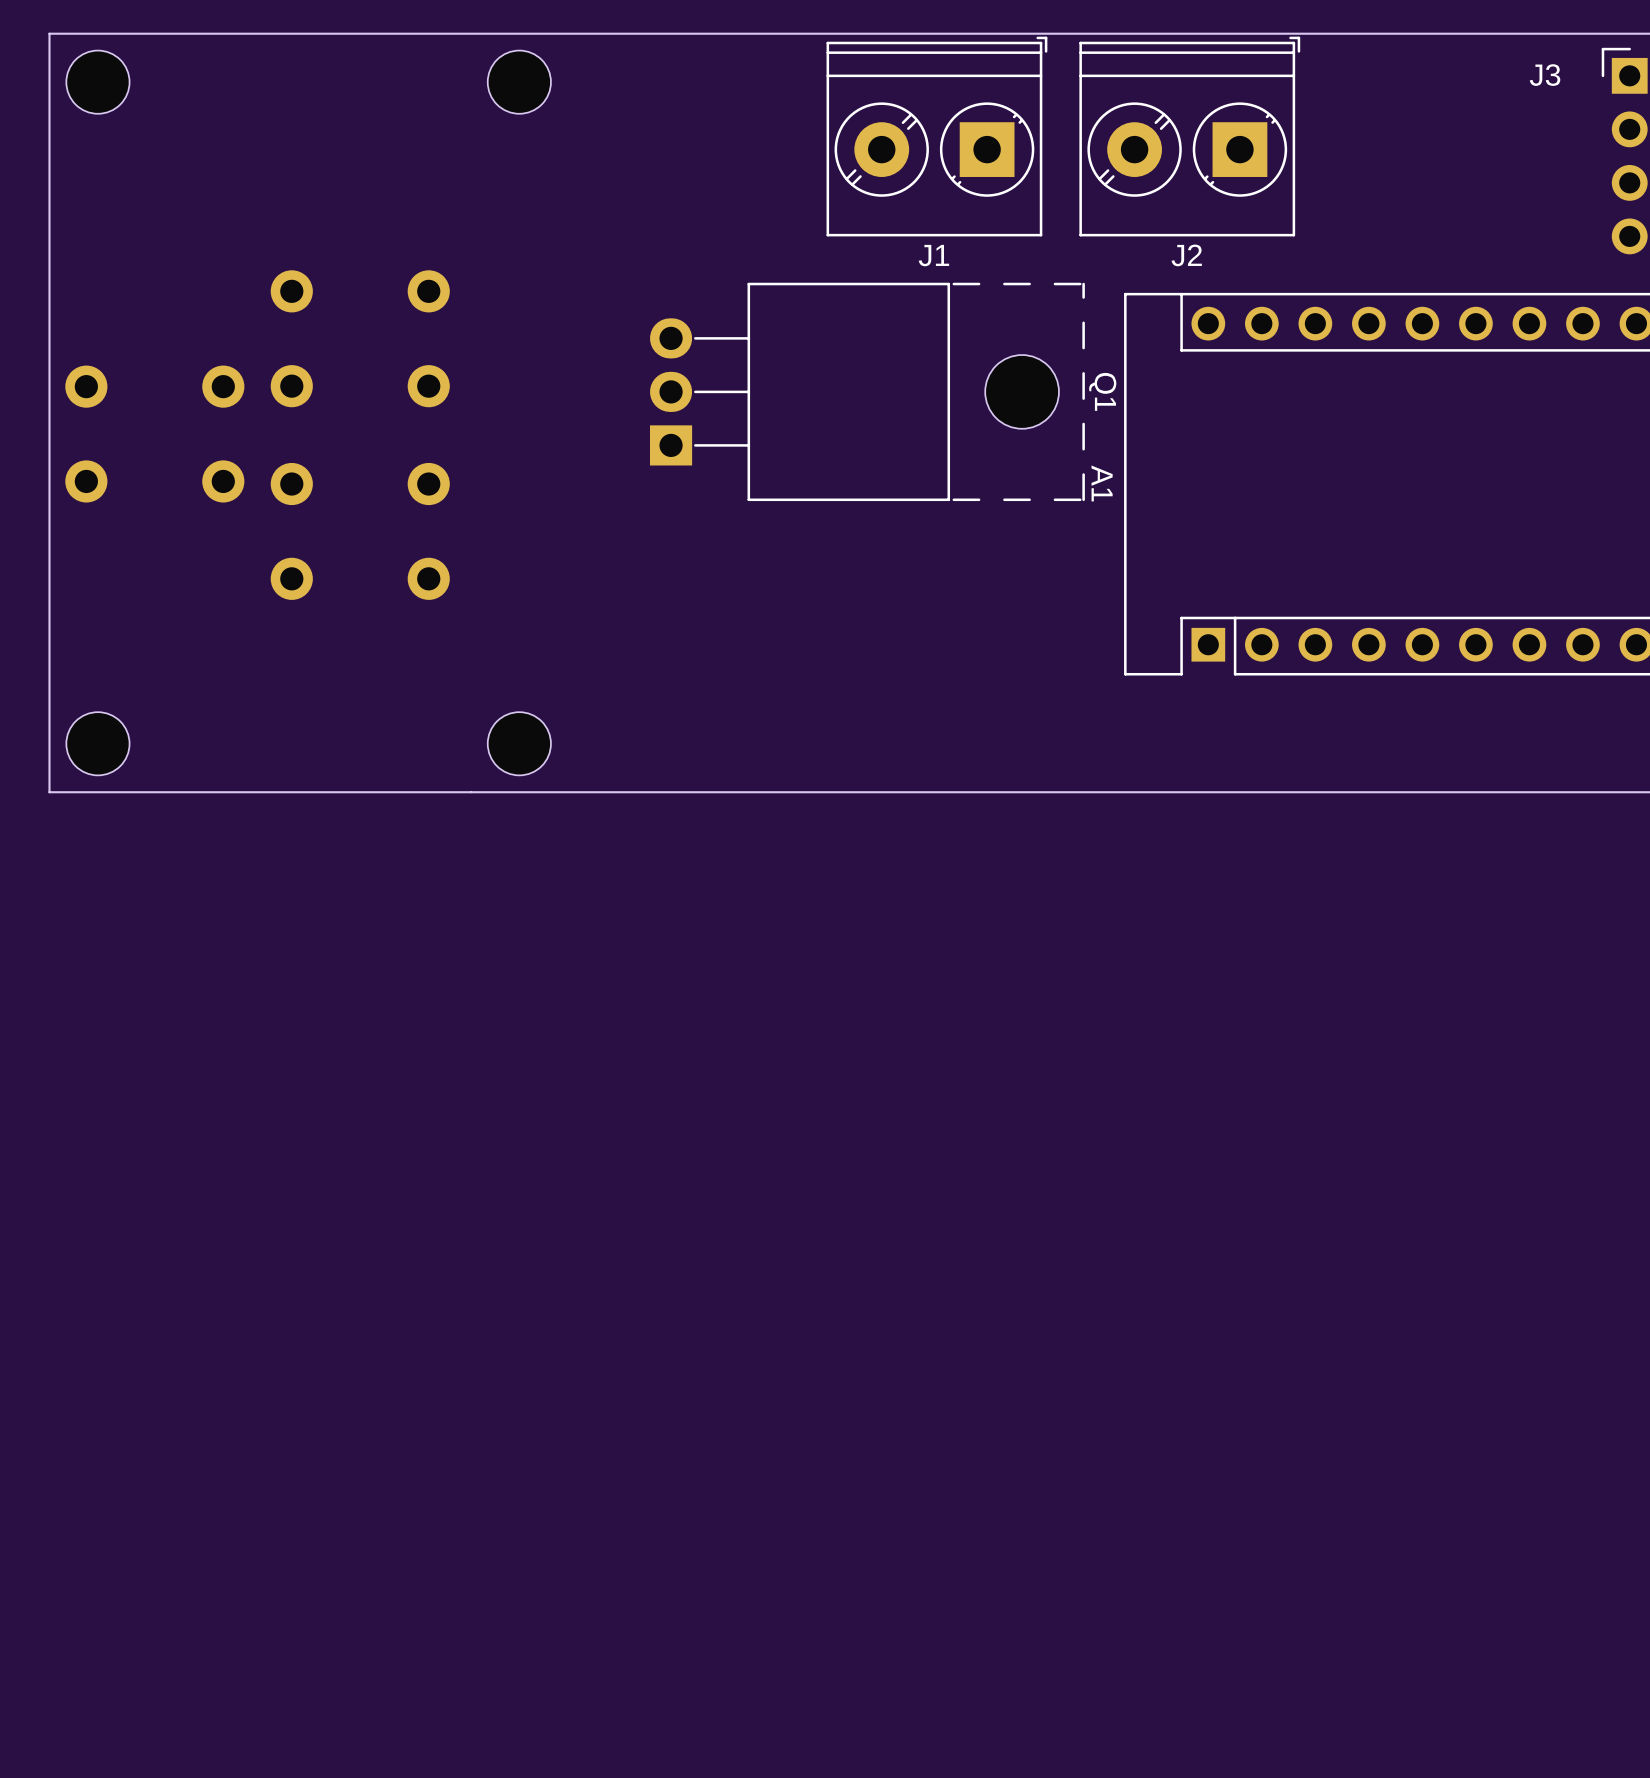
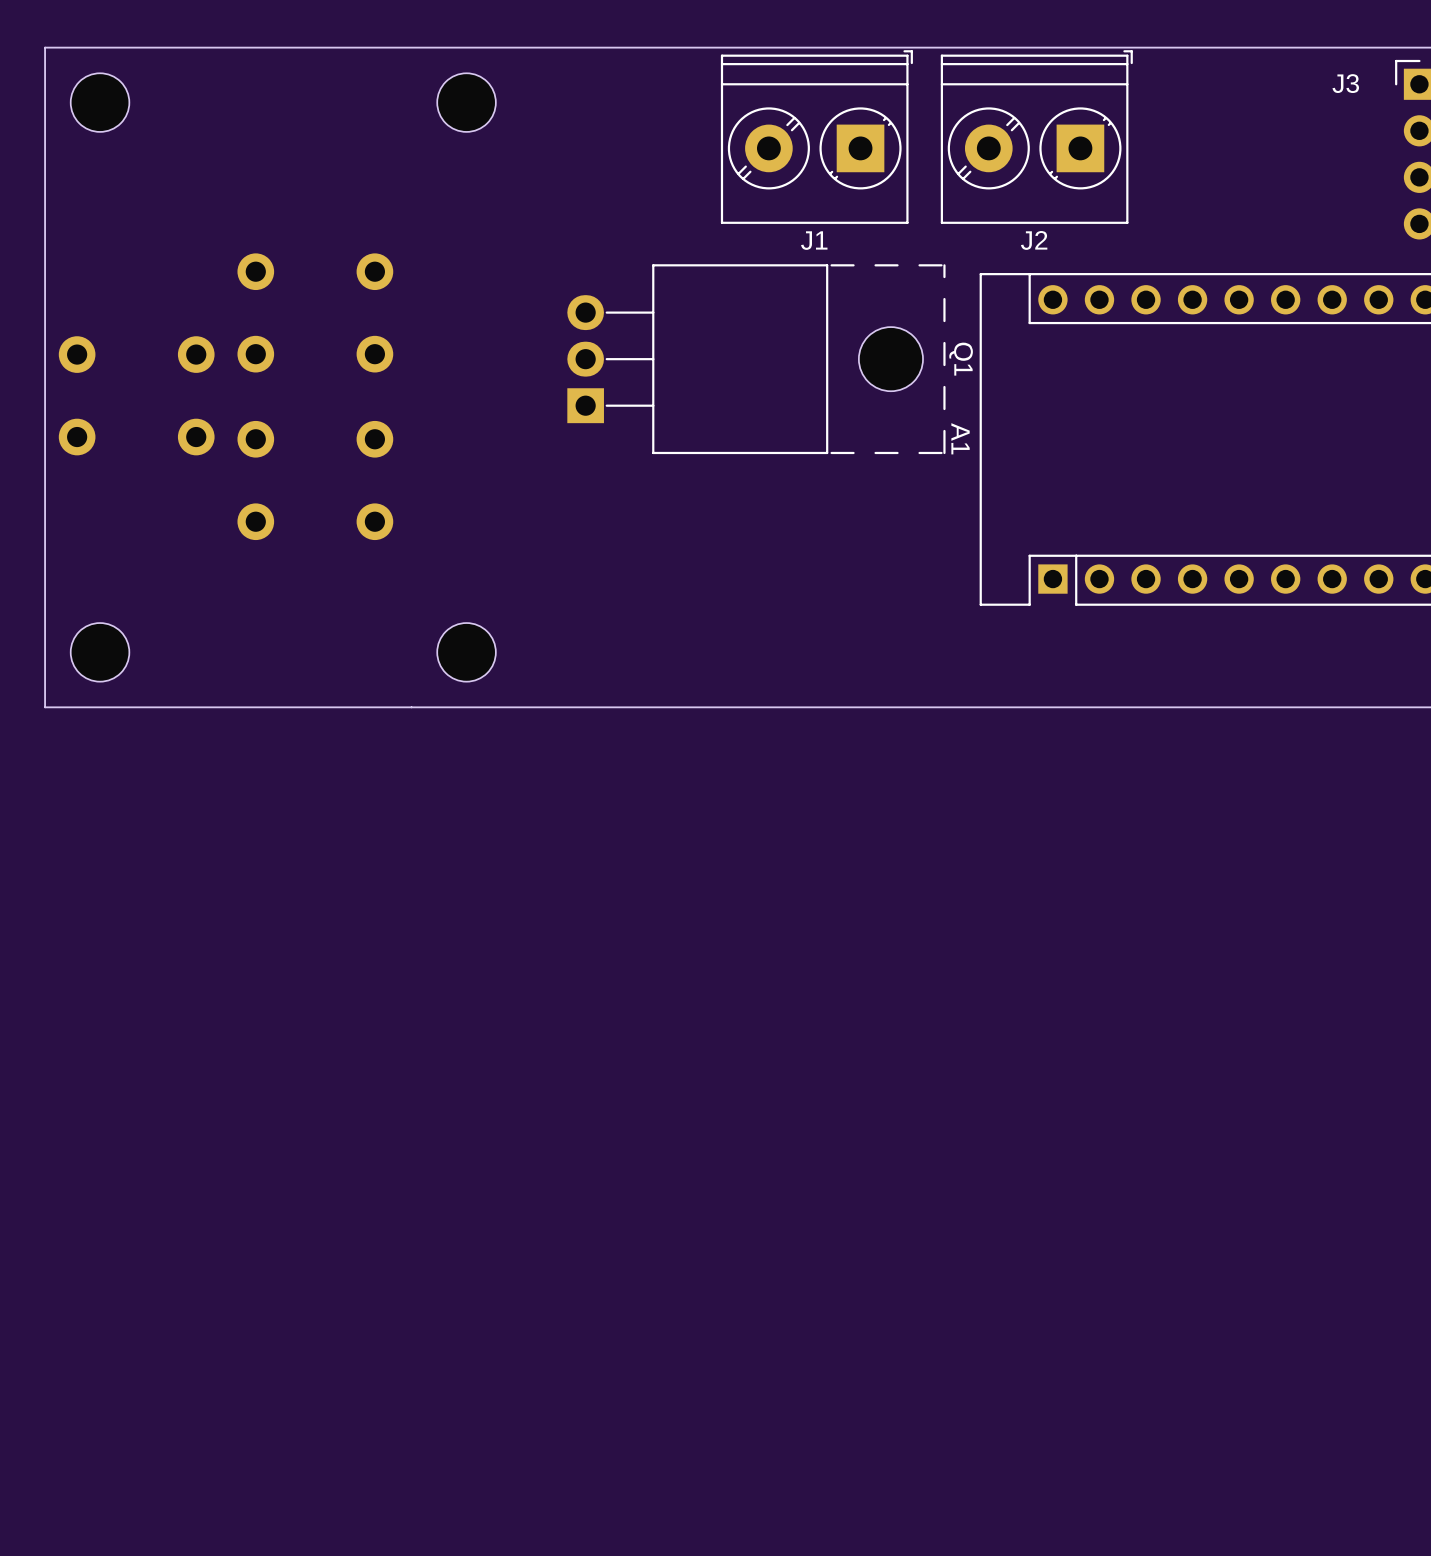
part footprint: [66, 50, 130, 114] -> [70, 73, 130, 132]
part footprint: [487, 50, 551, 114] -> [437, 73, 496, 132]
part footprint: [66, 712, 130, 776] -> [70, 623, 130, 682]
part footprint: [487, 712, 551, 776] -> [437, 623, 496, 682]

